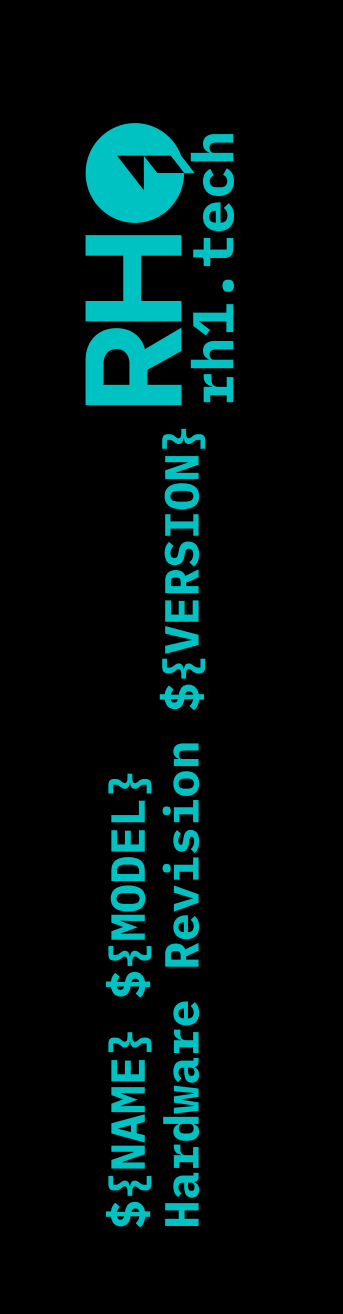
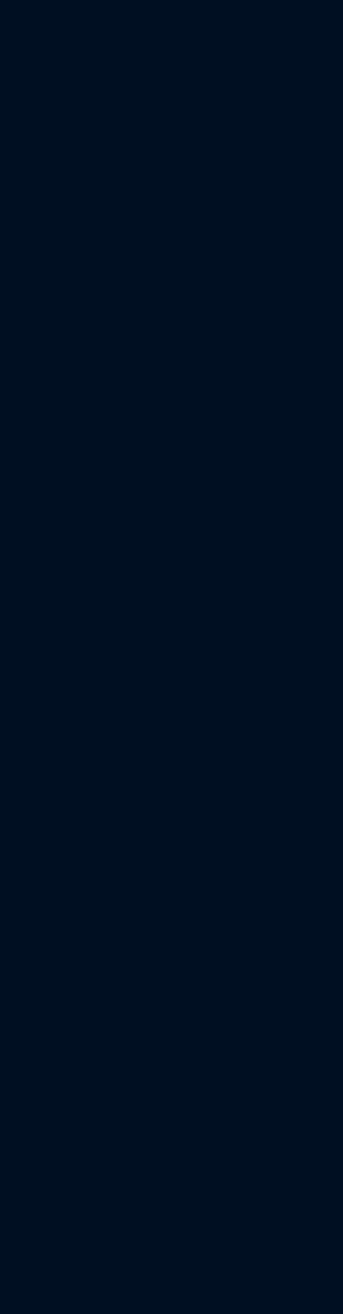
drawing: [85, 123, 195, 406] -> none
text: rh1.tech (212, 268) -> none
text: Hardware Revision ${VERSION} (182, 827) -> none
text: ${NAME} ${MODEL} (128, 1000) -> none

